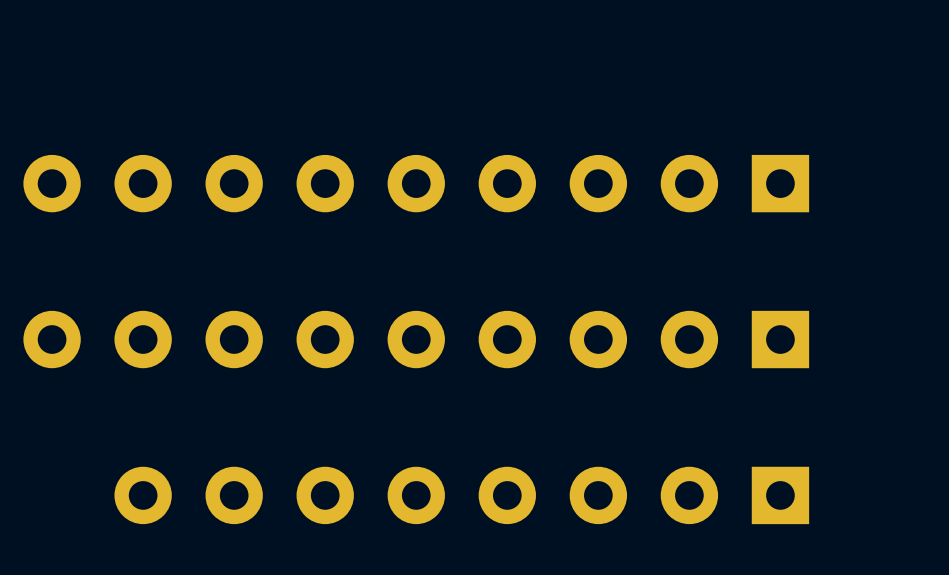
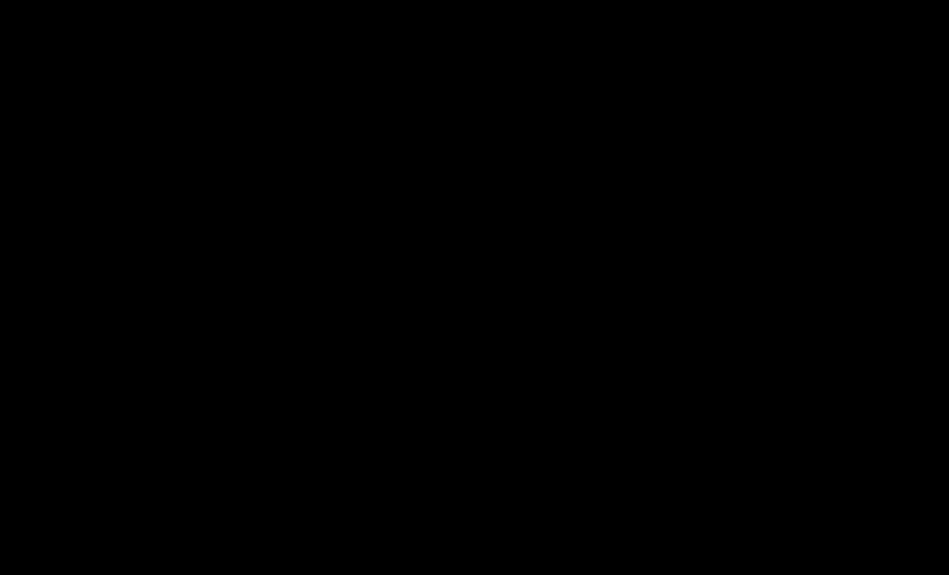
part: (416, 183) -> none
part: (416, 339) -> none
part: (461, 495) -> none

